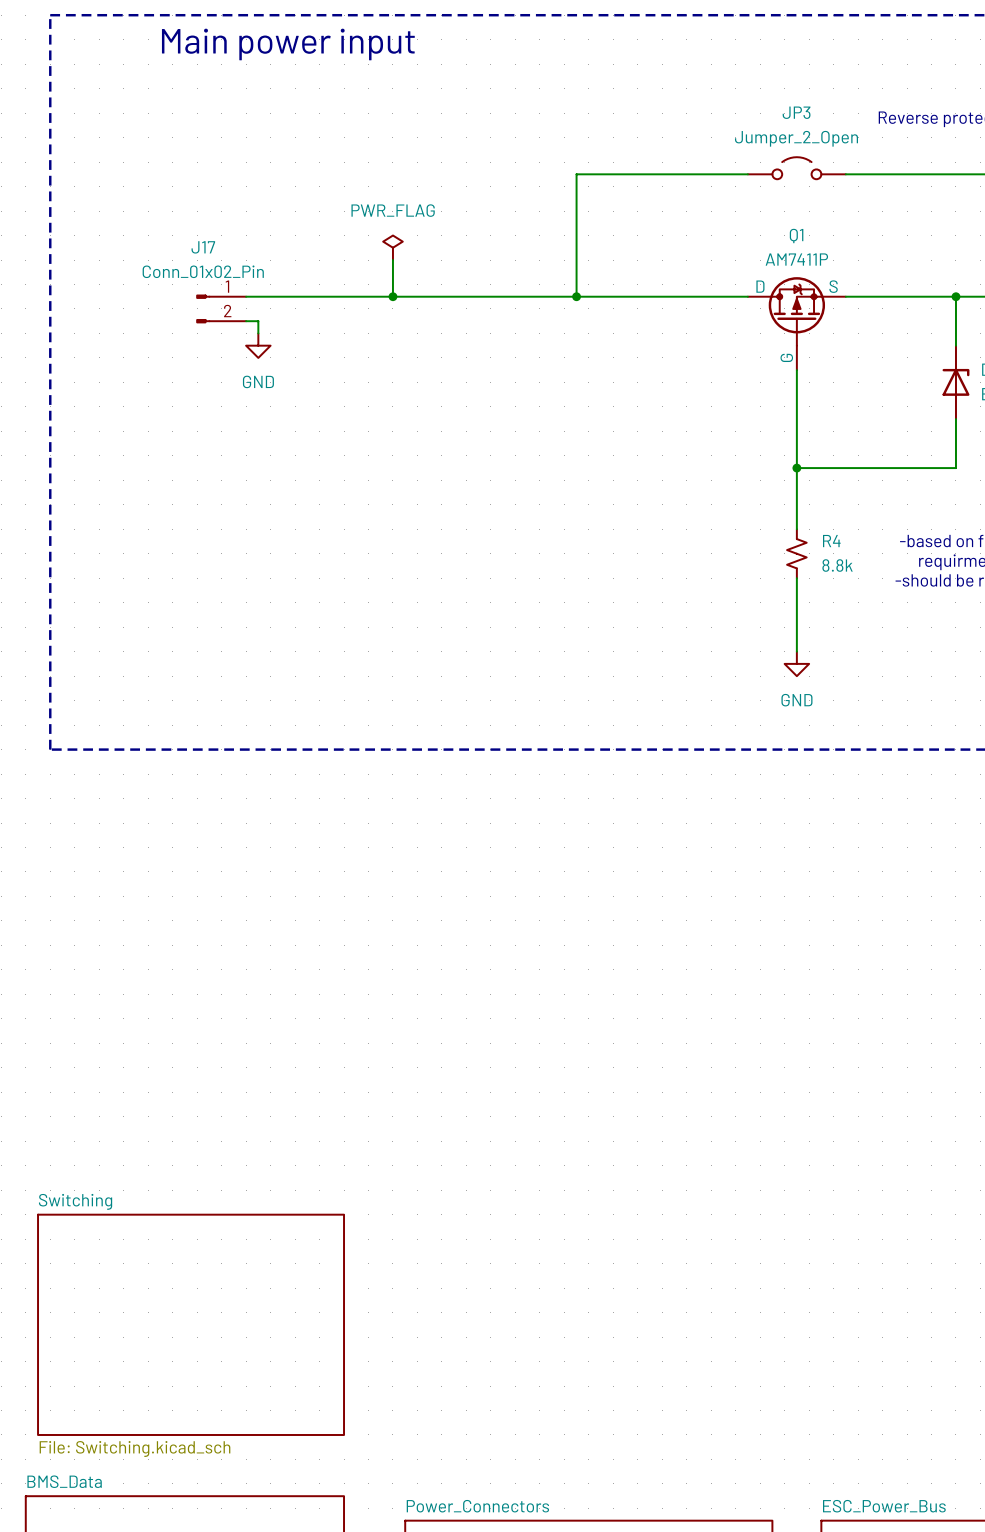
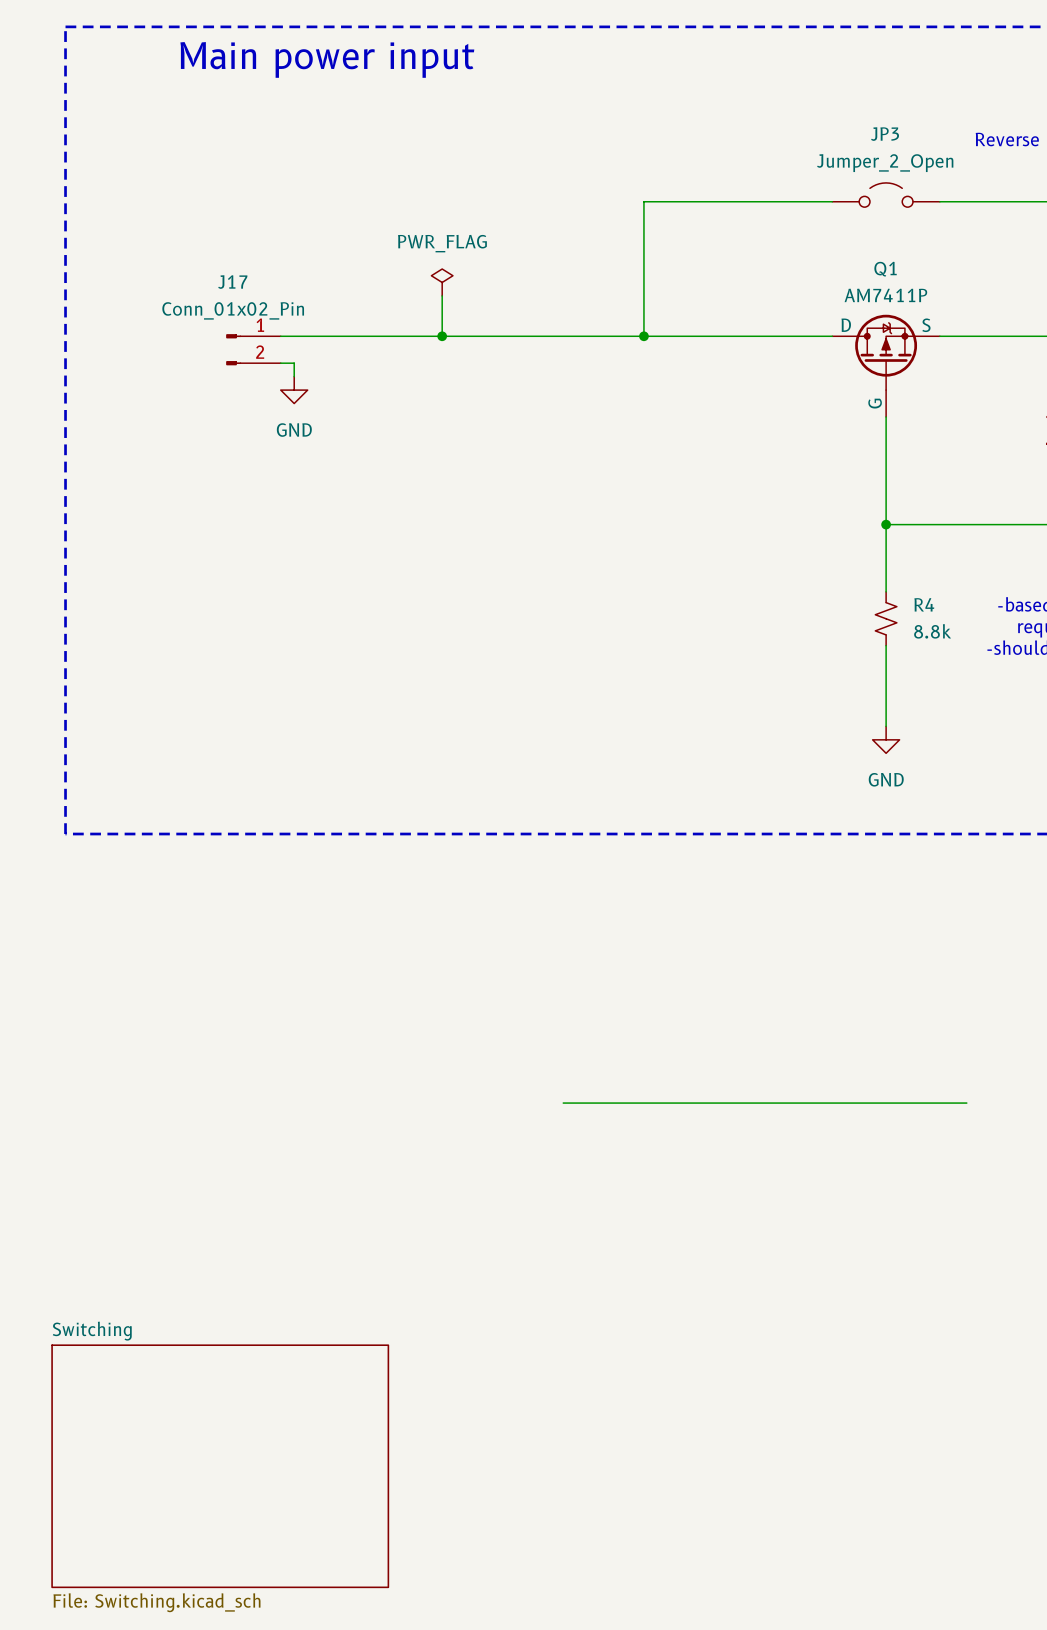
wire: none -> (563, 1103) (966, 1103)

